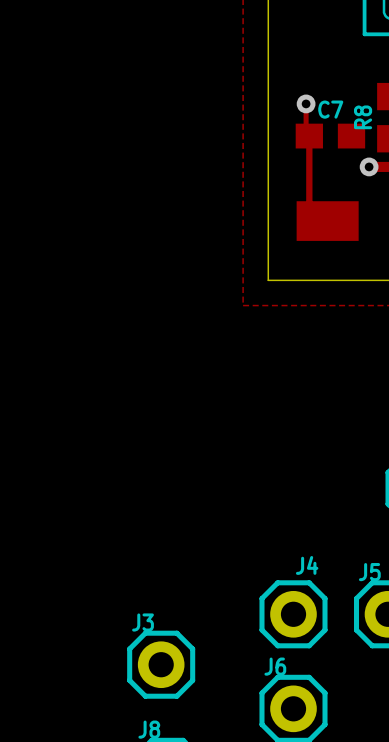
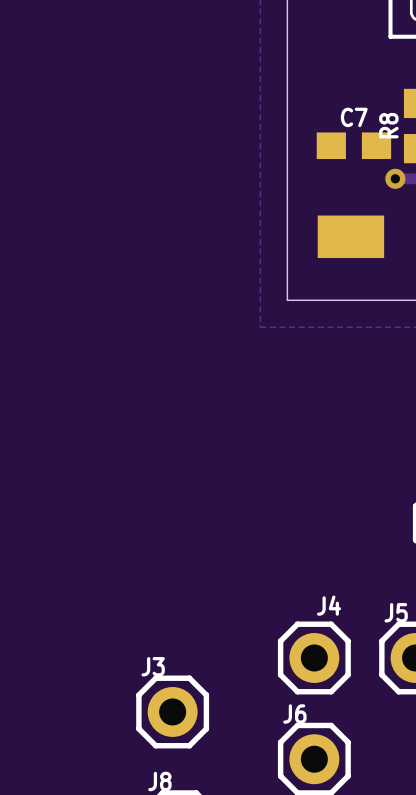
track: (306, 103) (306, 132) (309, 136) (309, 202) (327, 221) -> none
via: (306, 103) -> none

